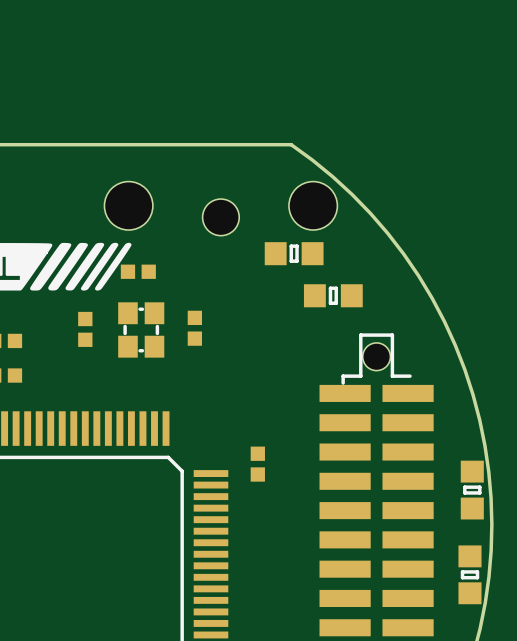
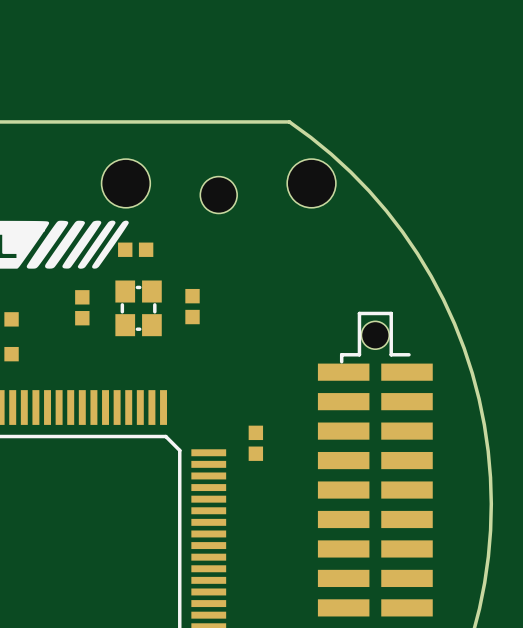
part: (294, 253) -> none
part: (333, 295) -> none
part: (472, 490) -> none
part: (469, 574) -> none

